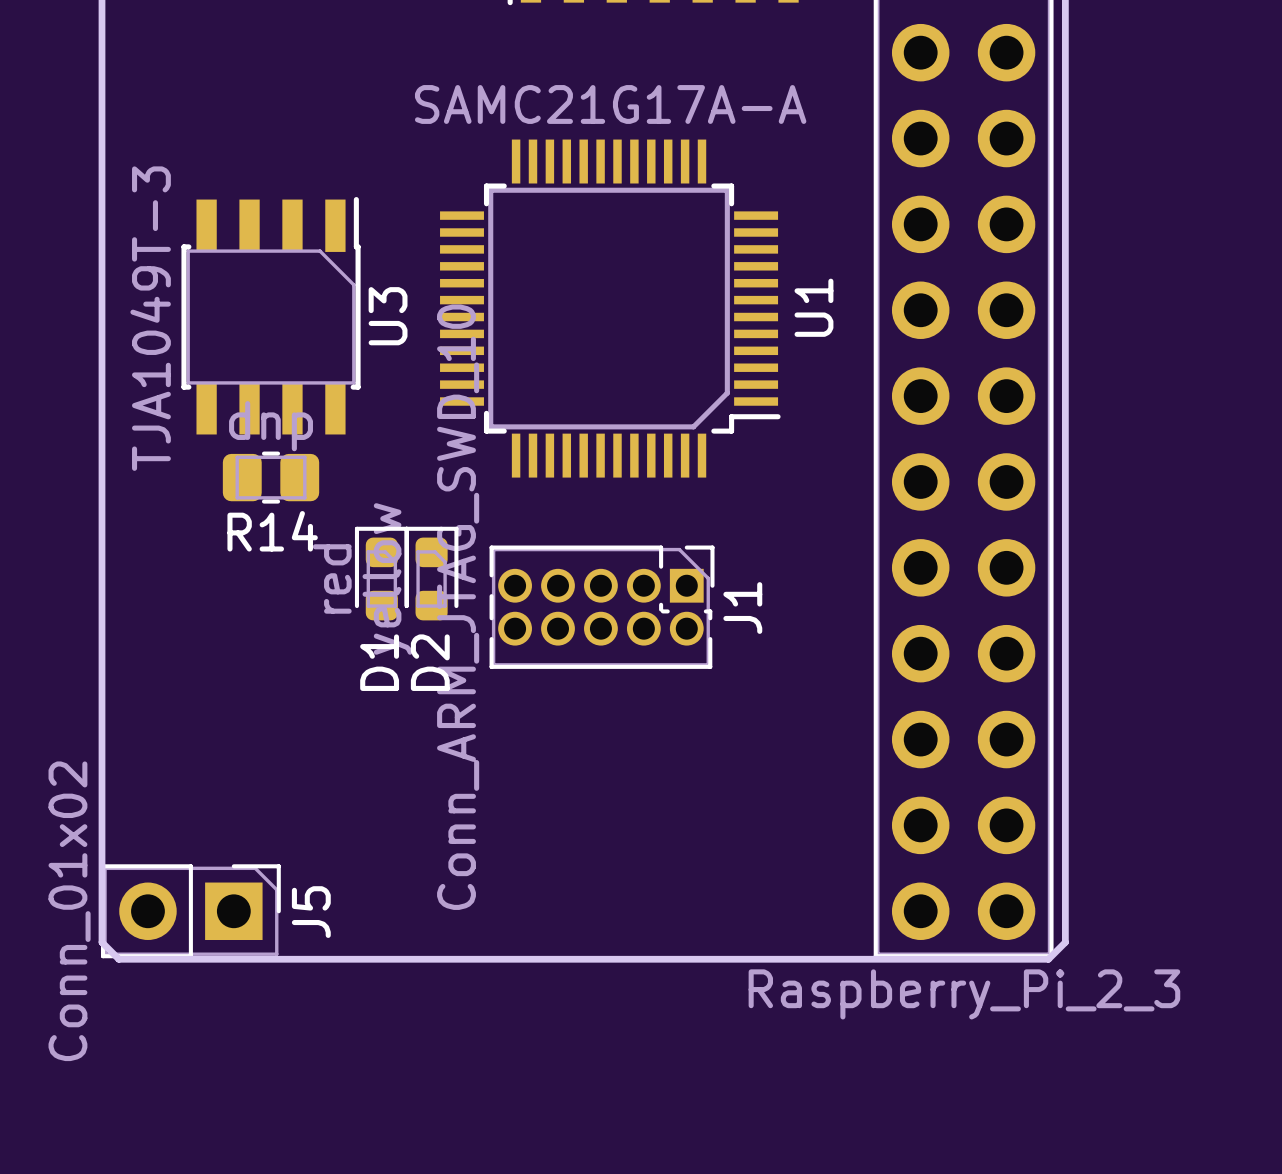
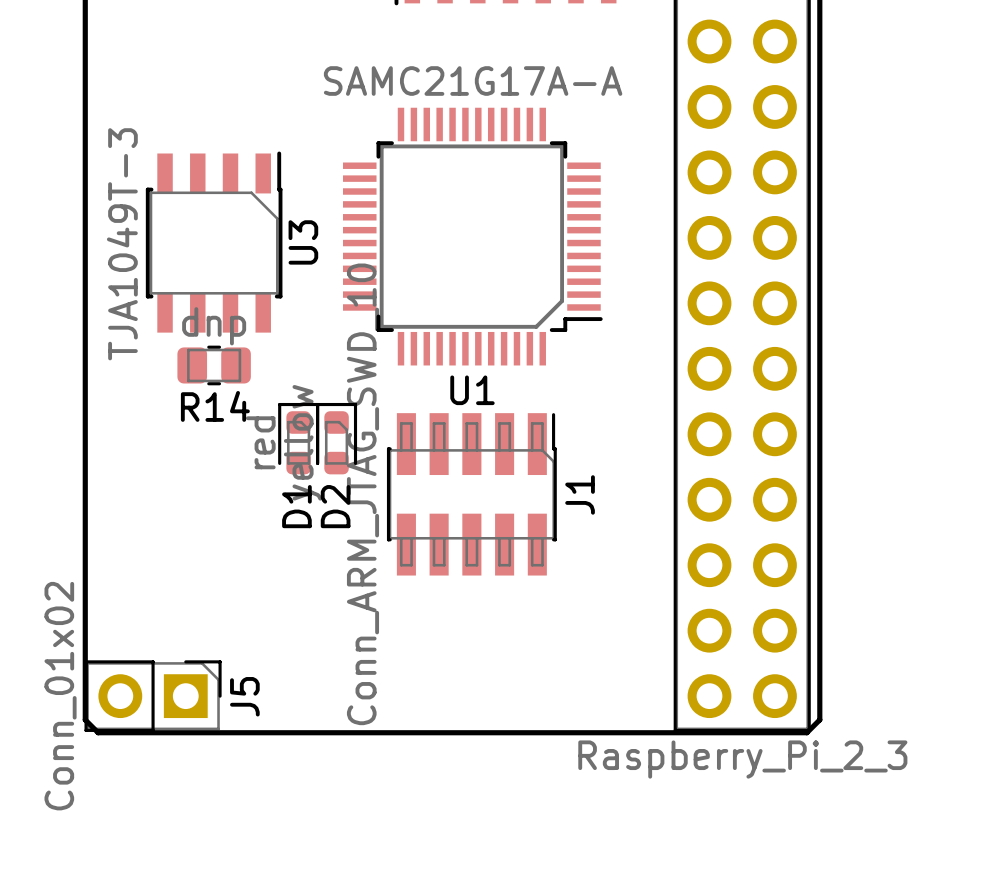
U1 name rotation: 0° (813, 307) -> 90° clockwise (472, 390)
U1 name position: U1 (813, 307) -> U1 (472, 390)
J1 footprint: [489, 545, 715, 669] -> [386, 413, 557, 576]

